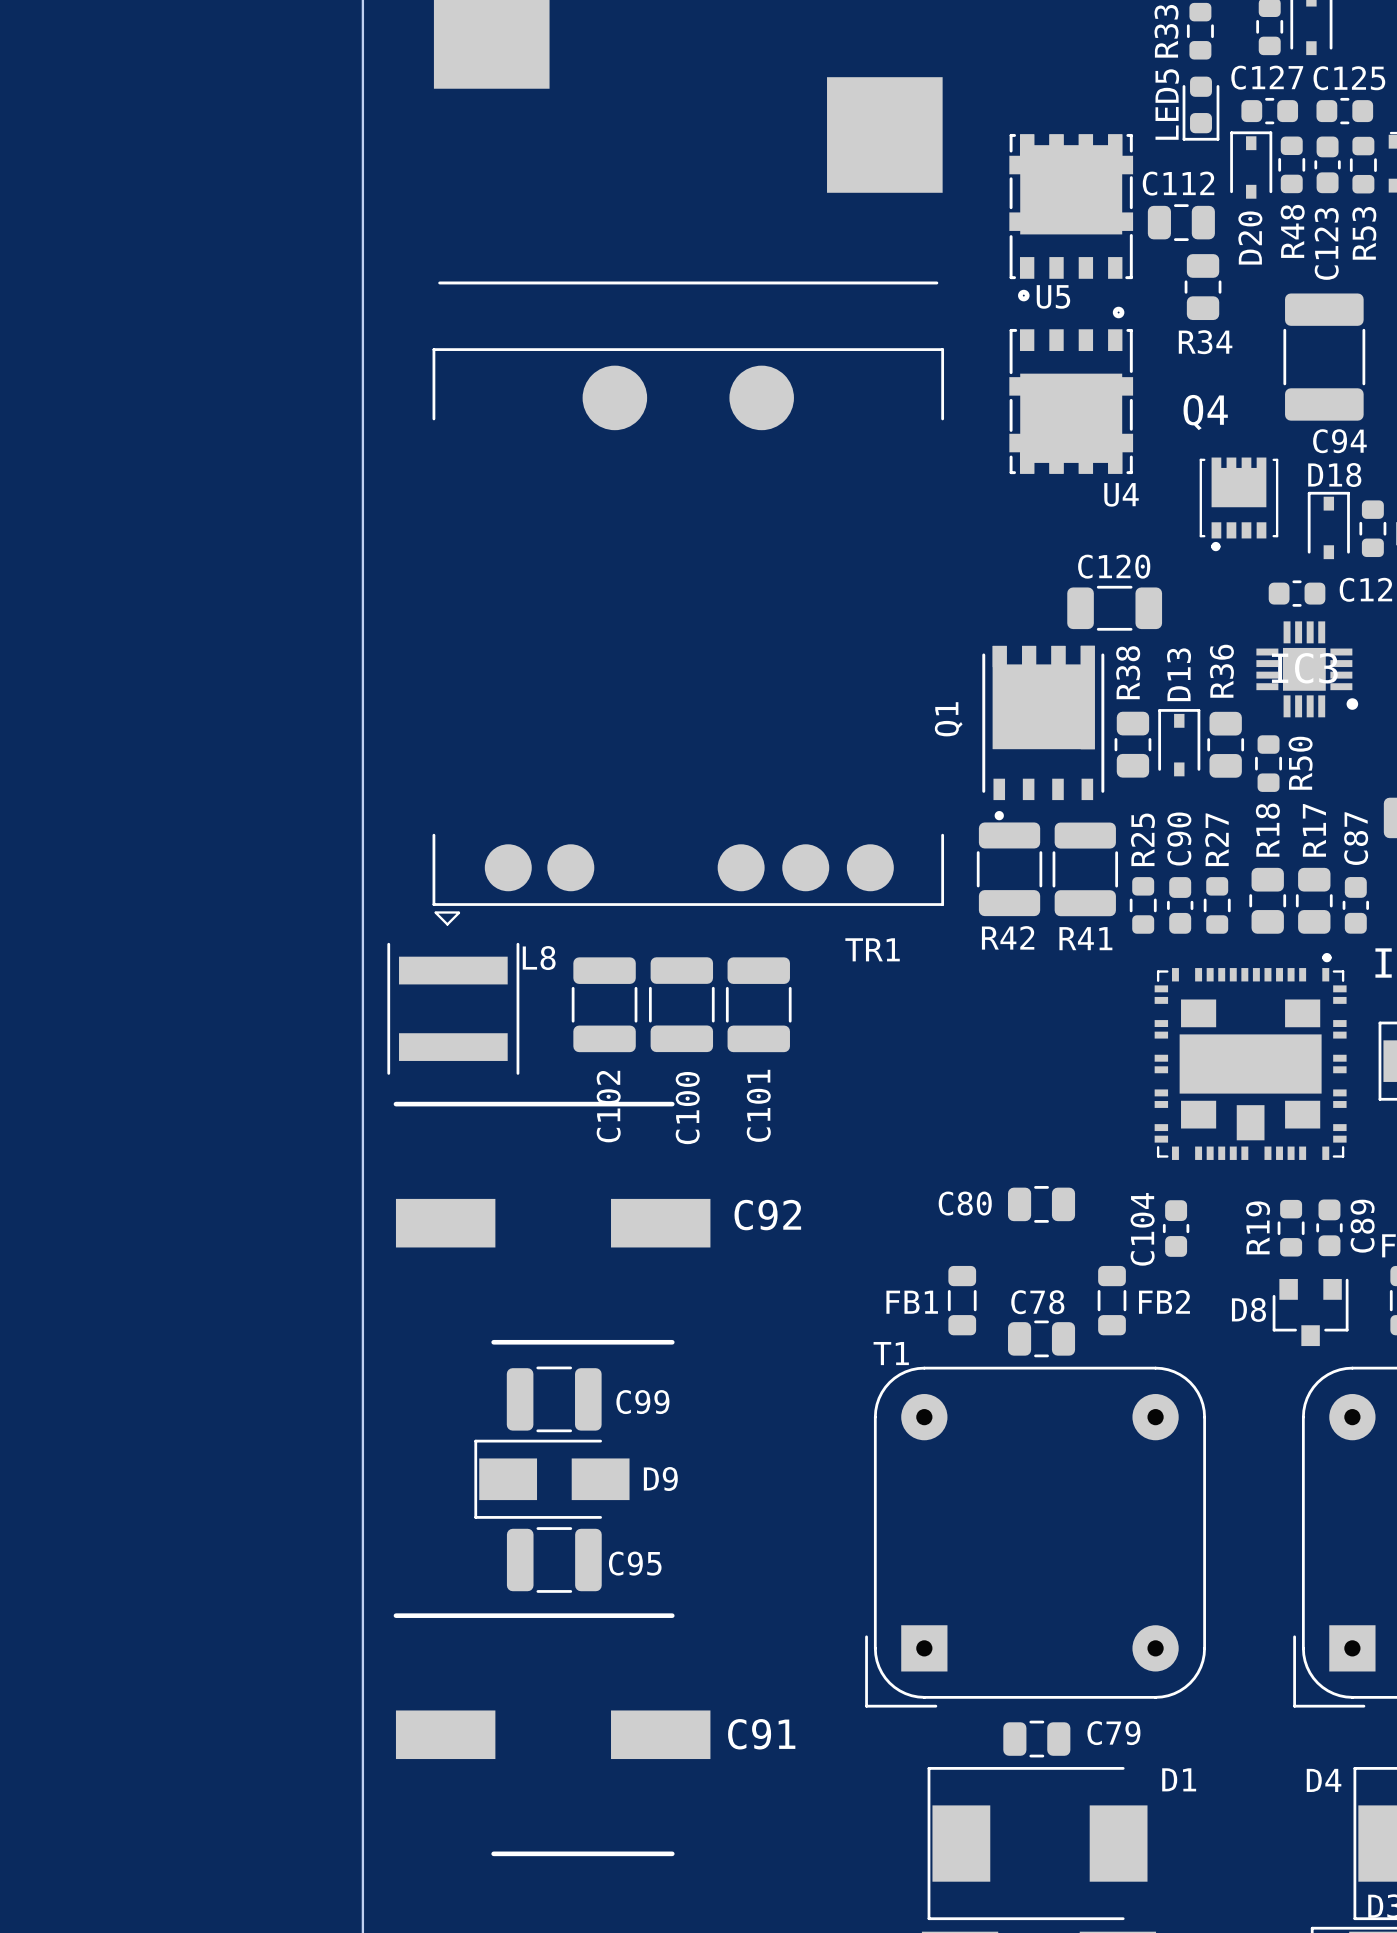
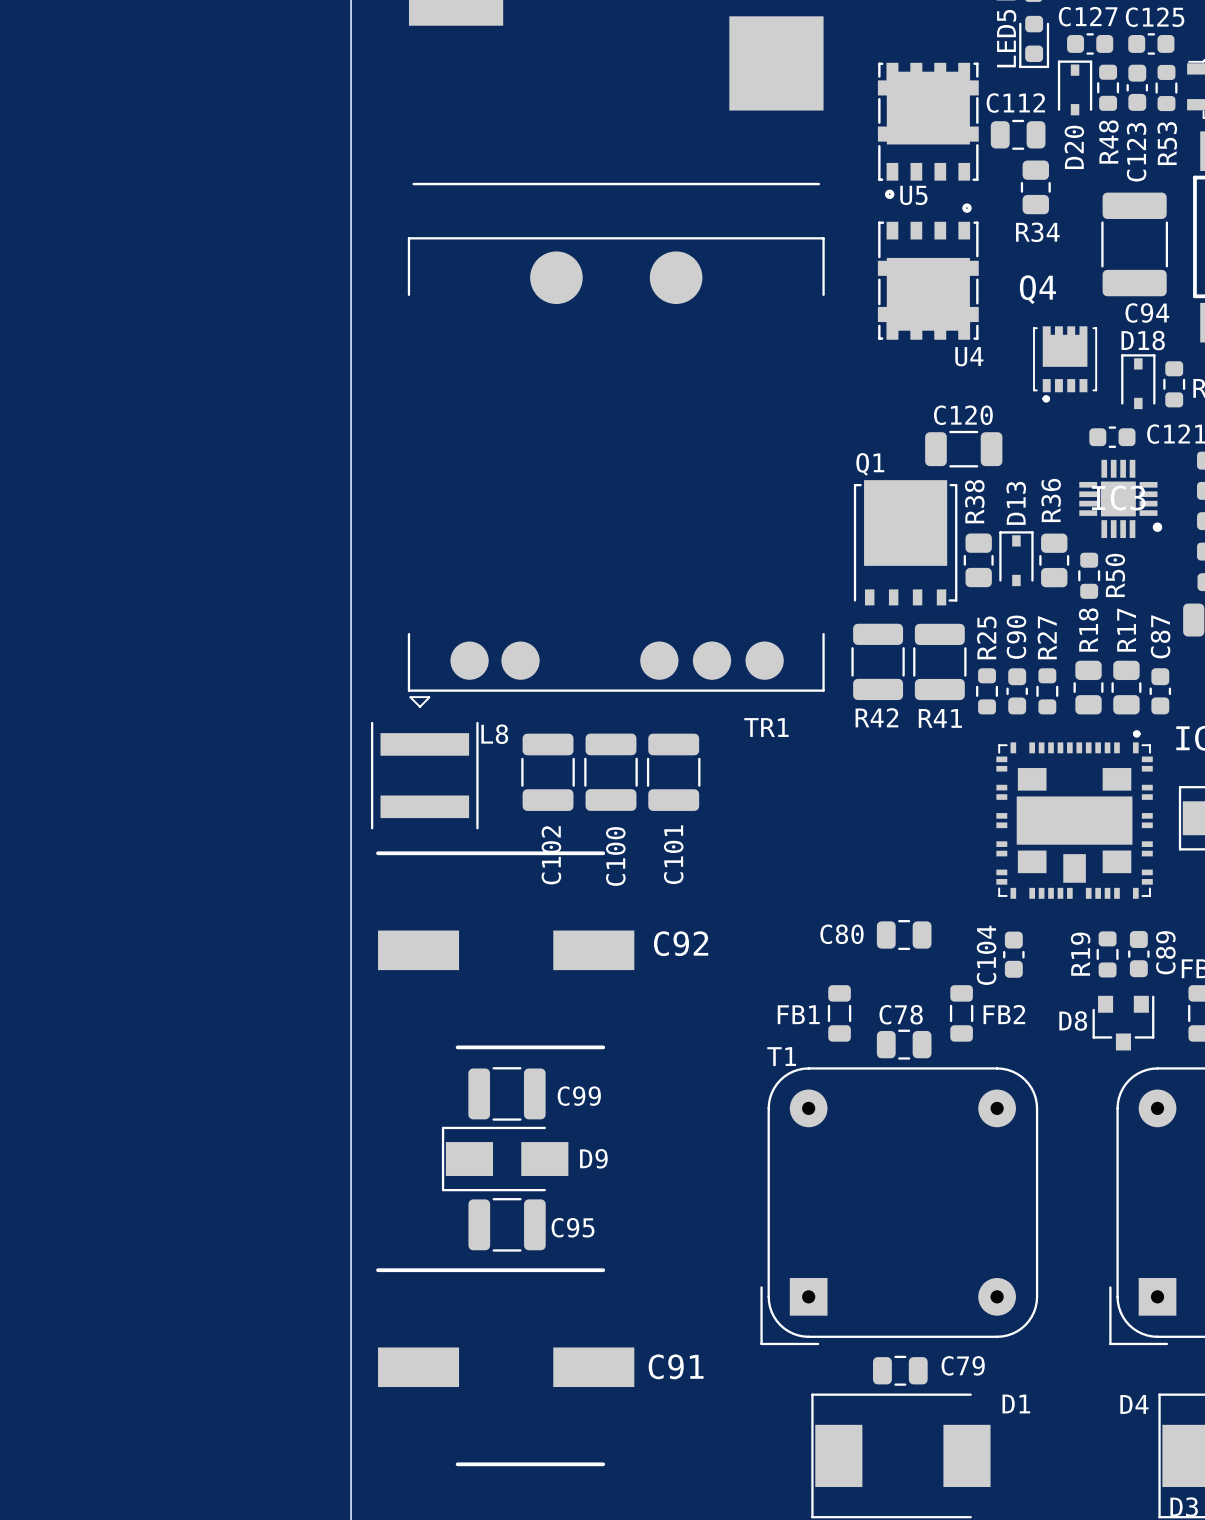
Q1 footprint: [982, 645, 1105, 821] -> [853, 480, 958, 606]
Q1 name position: Q1 (948, 719) -> Q1 (870, 464)

